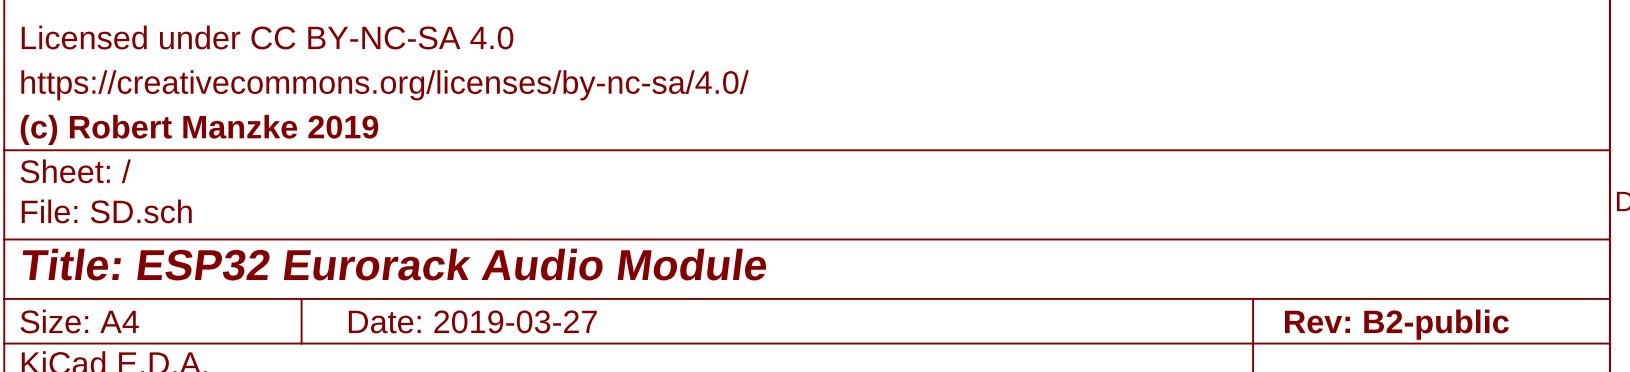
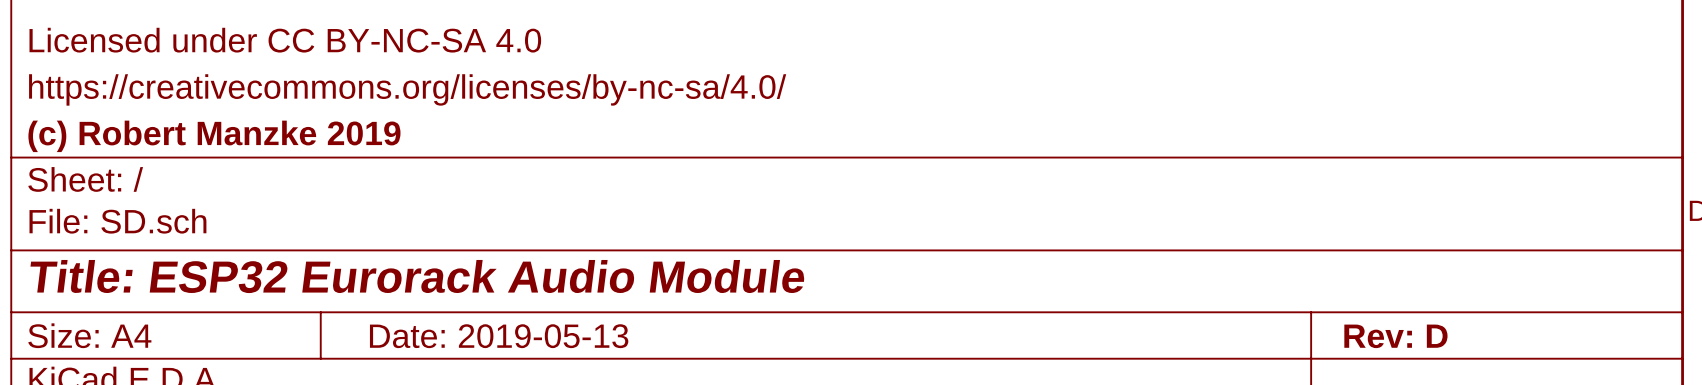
title block: Date: 2019-03-27 (472, 321) -> Date: 2019-05-13 (499, 336)
title block: Rev: B2-public (1396, 324) -> Rev: D (1395, 336)

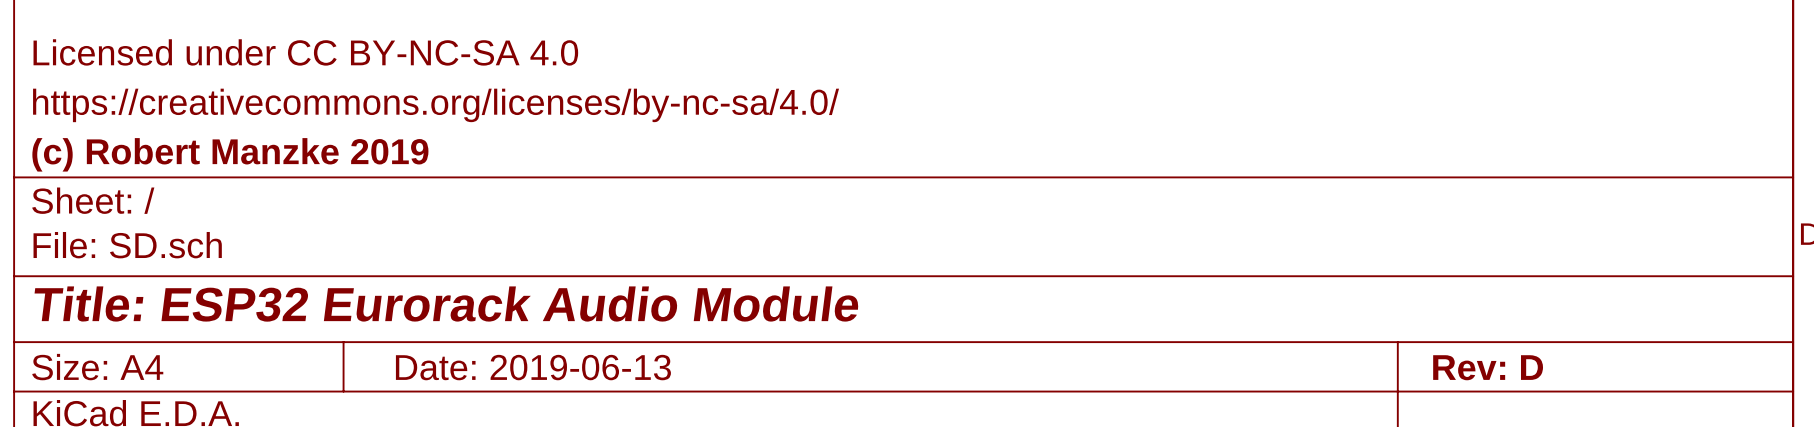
title block: Date: 2019-05-13 (499, 336) -> Date: 2019-06-13 (533, 367)

